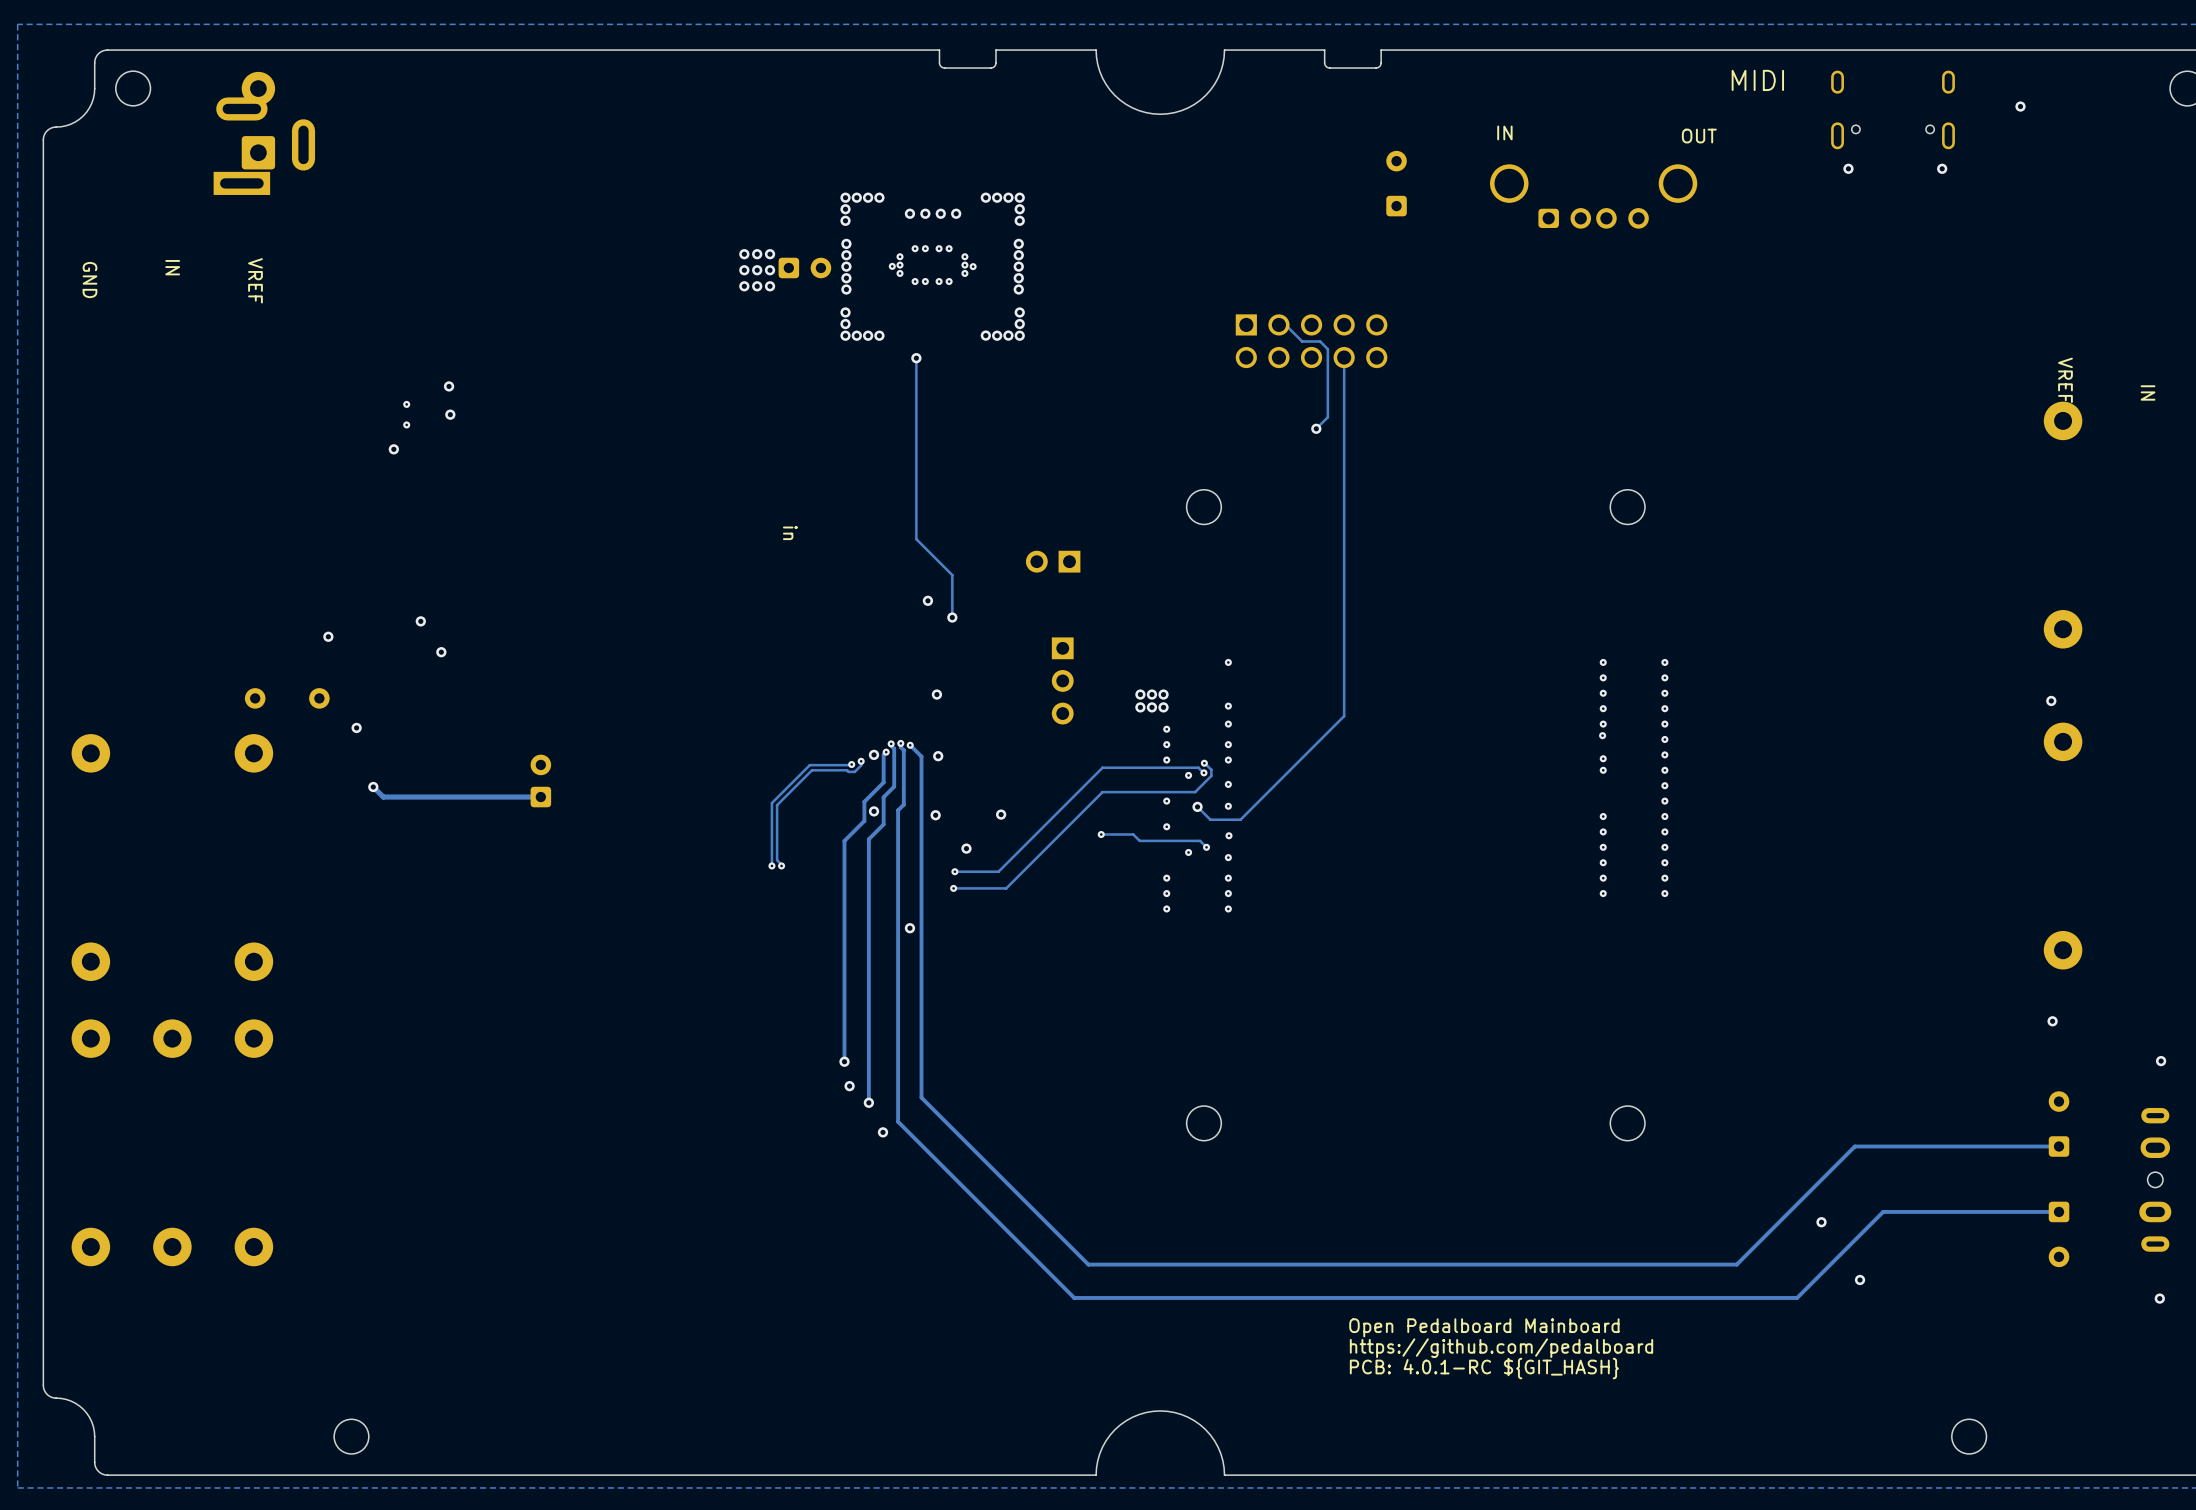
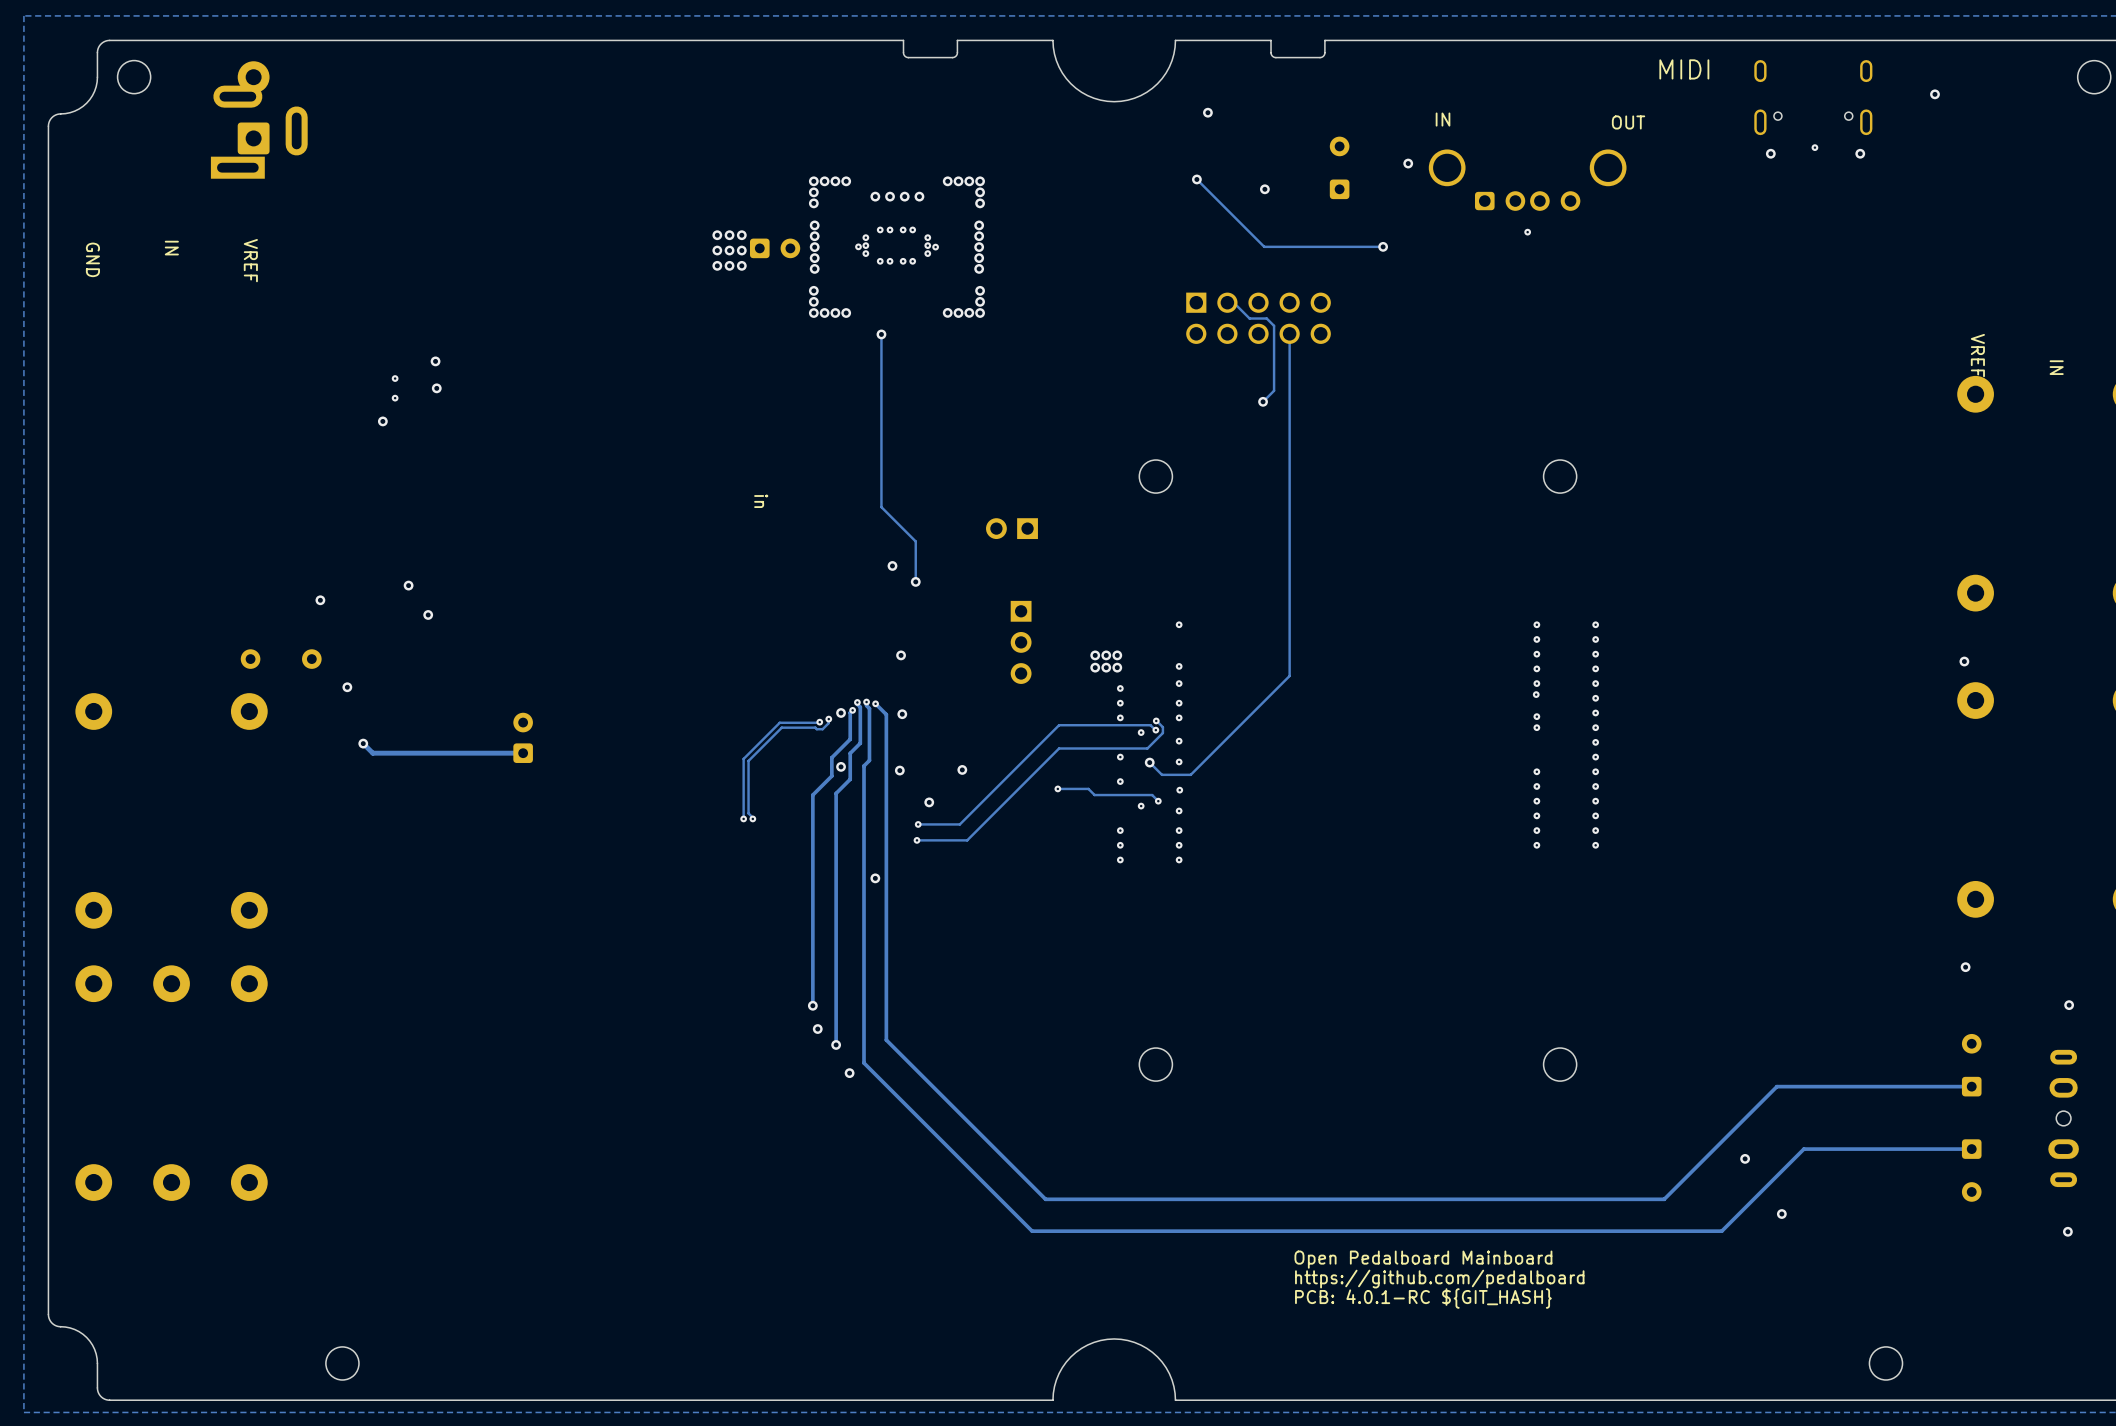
via: none -> (1207, 112)
via: none -> (1814, 147)
via: none -> (1408, 163)
via: none -> (1196, 179)
track: none -> (1197, 180) (1264, 246) (1383, 246)
via: none -> (1264, 189)
via: none -> (1527, 232)
via: none -> (1383, 246)

